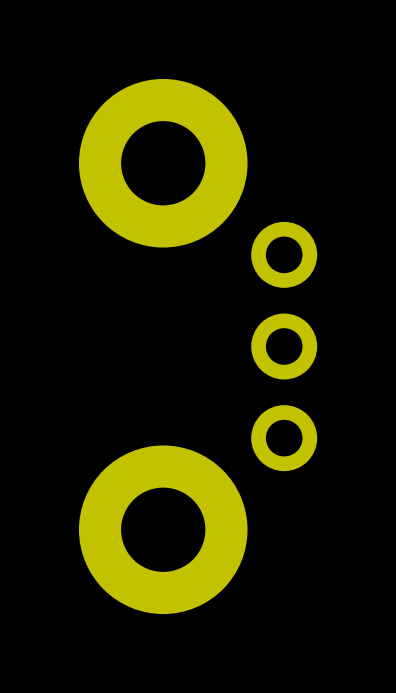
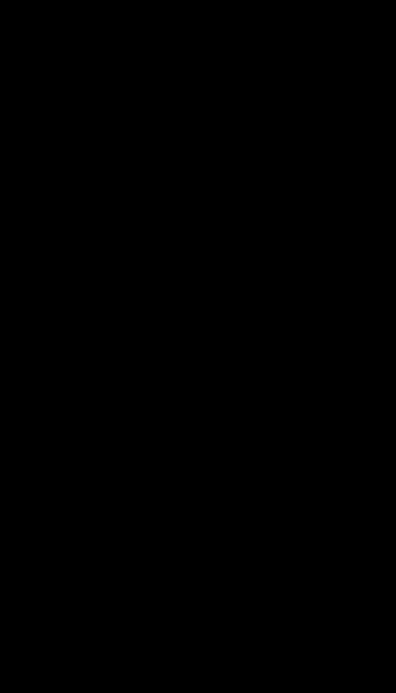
part: (198, 346) -> none

